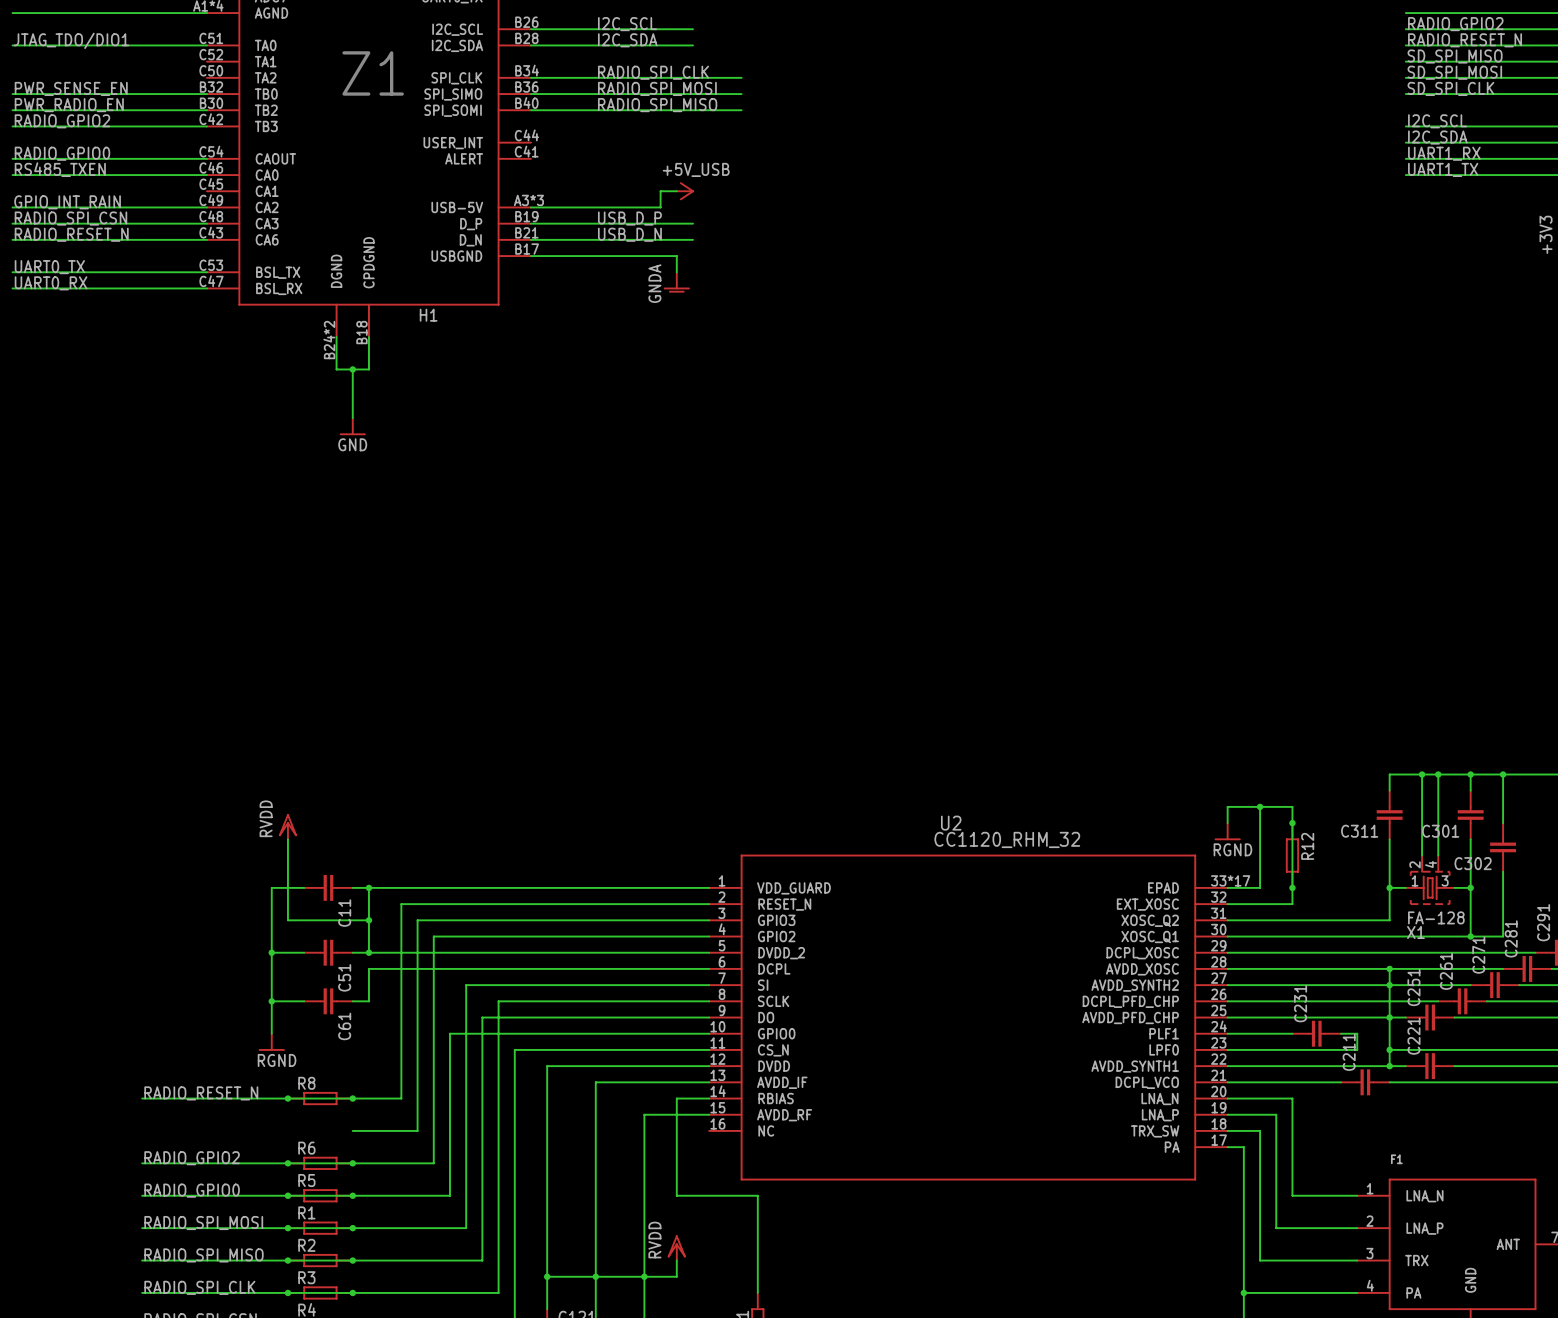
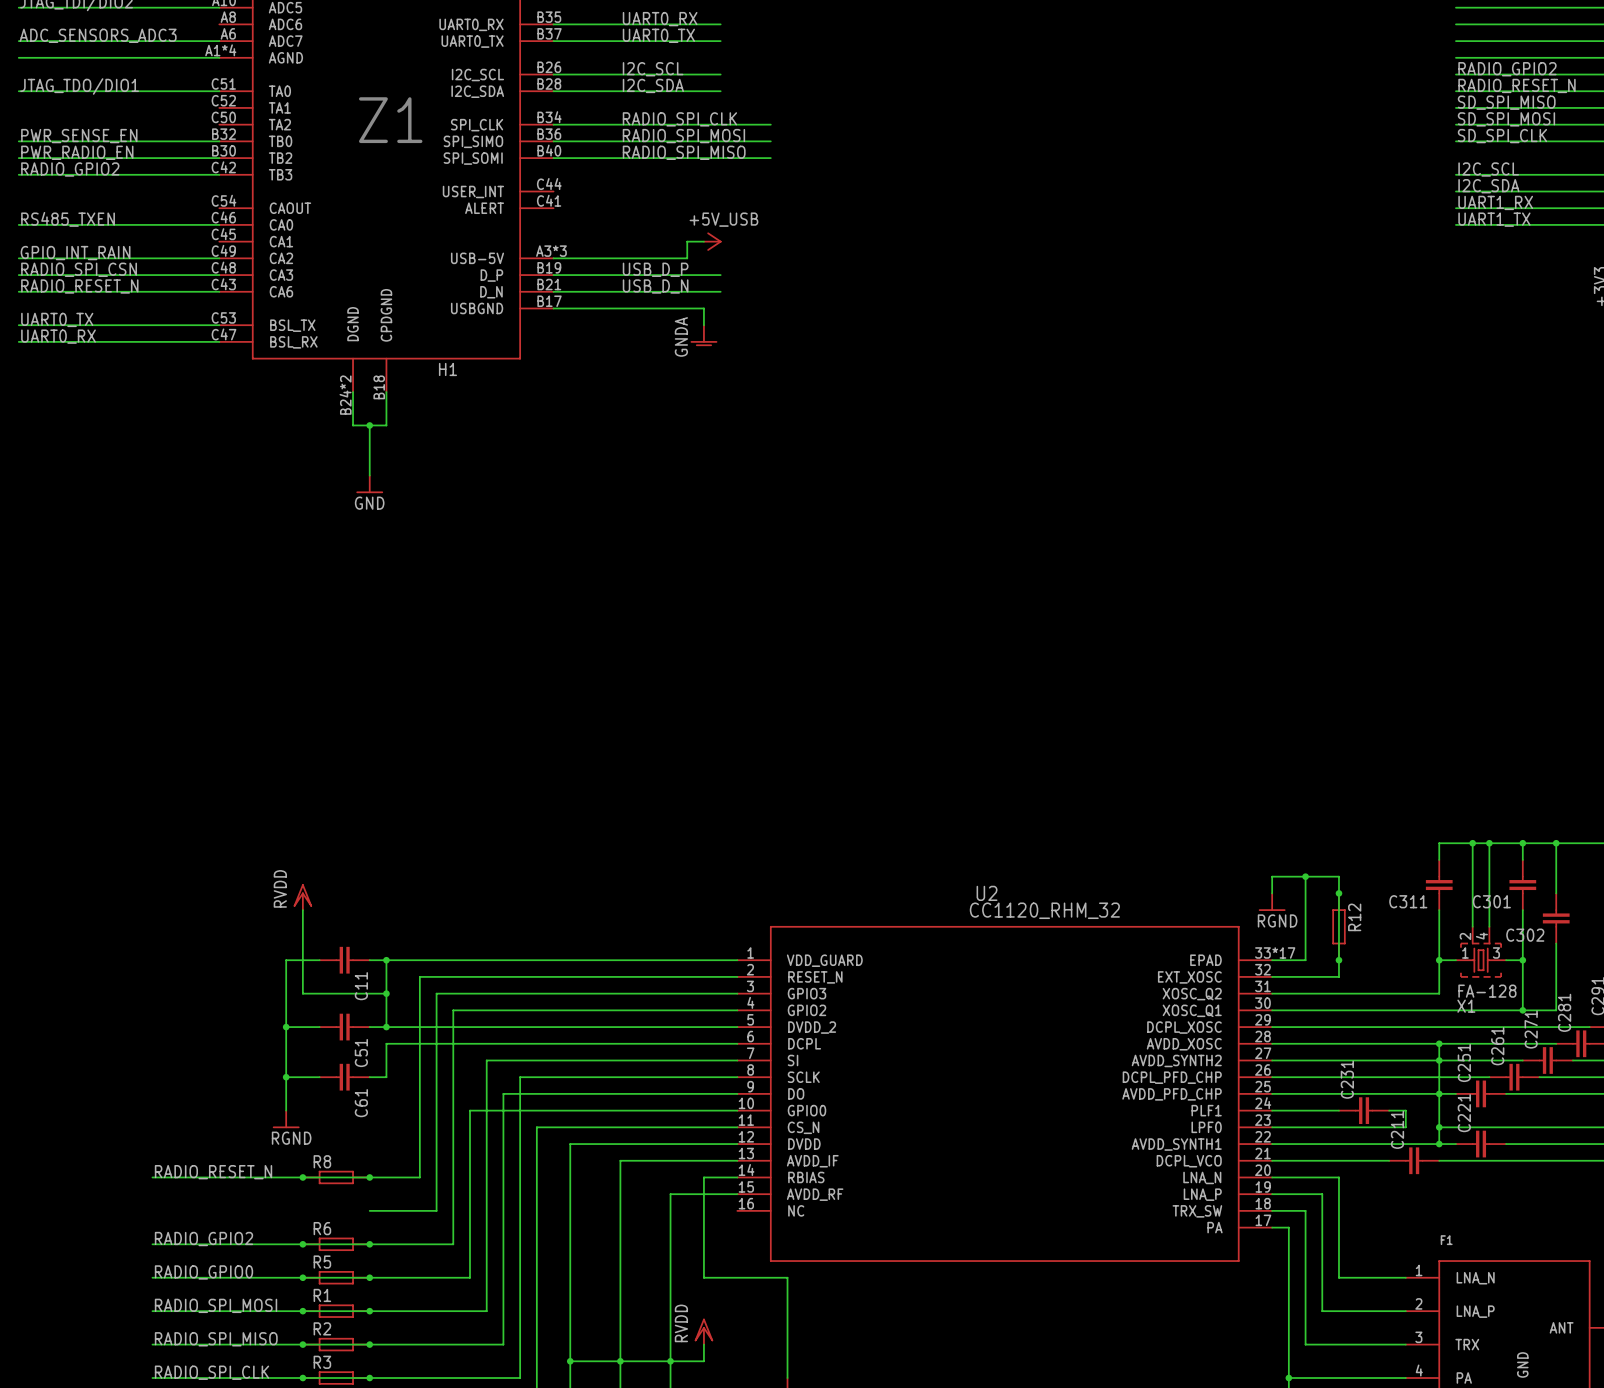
label: RADIO_GPIO0 (62, 153) -> none
wire: (12, 158) (206, 158) -> none

